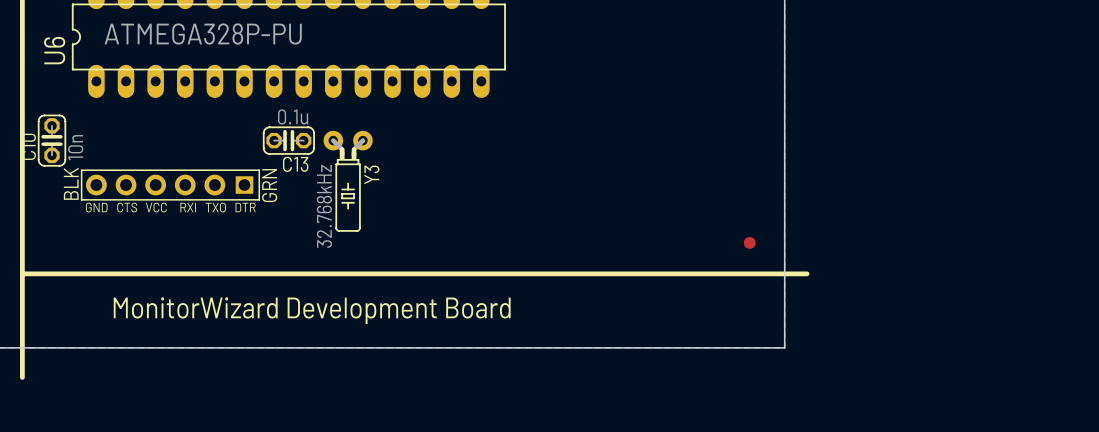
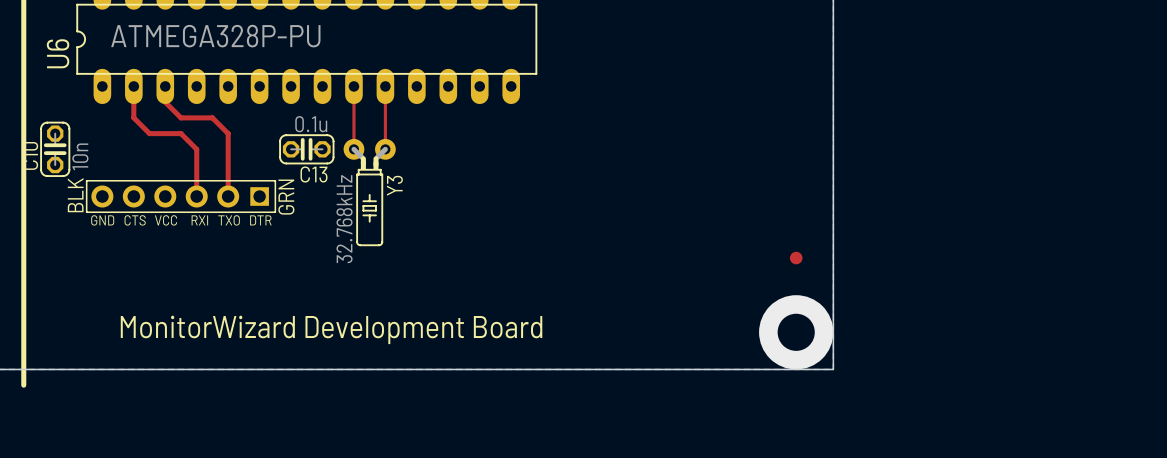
top track: none -> (133, 86) (133, 117) (149, 133) (181, 133) (196, 149) (196, 196)
top track: none -> (165, 86) (165, 102) (181, 117) (212, 117) (228, 133) (228, 196)
top track: none -> (353, 86) (353, 149)
top track: none -> (385, 86) (385, 149)
line: (22, 273) (807, 273) -> none
via: none -> (796, 332)
line: (22, 362) (22, 377) -> none

